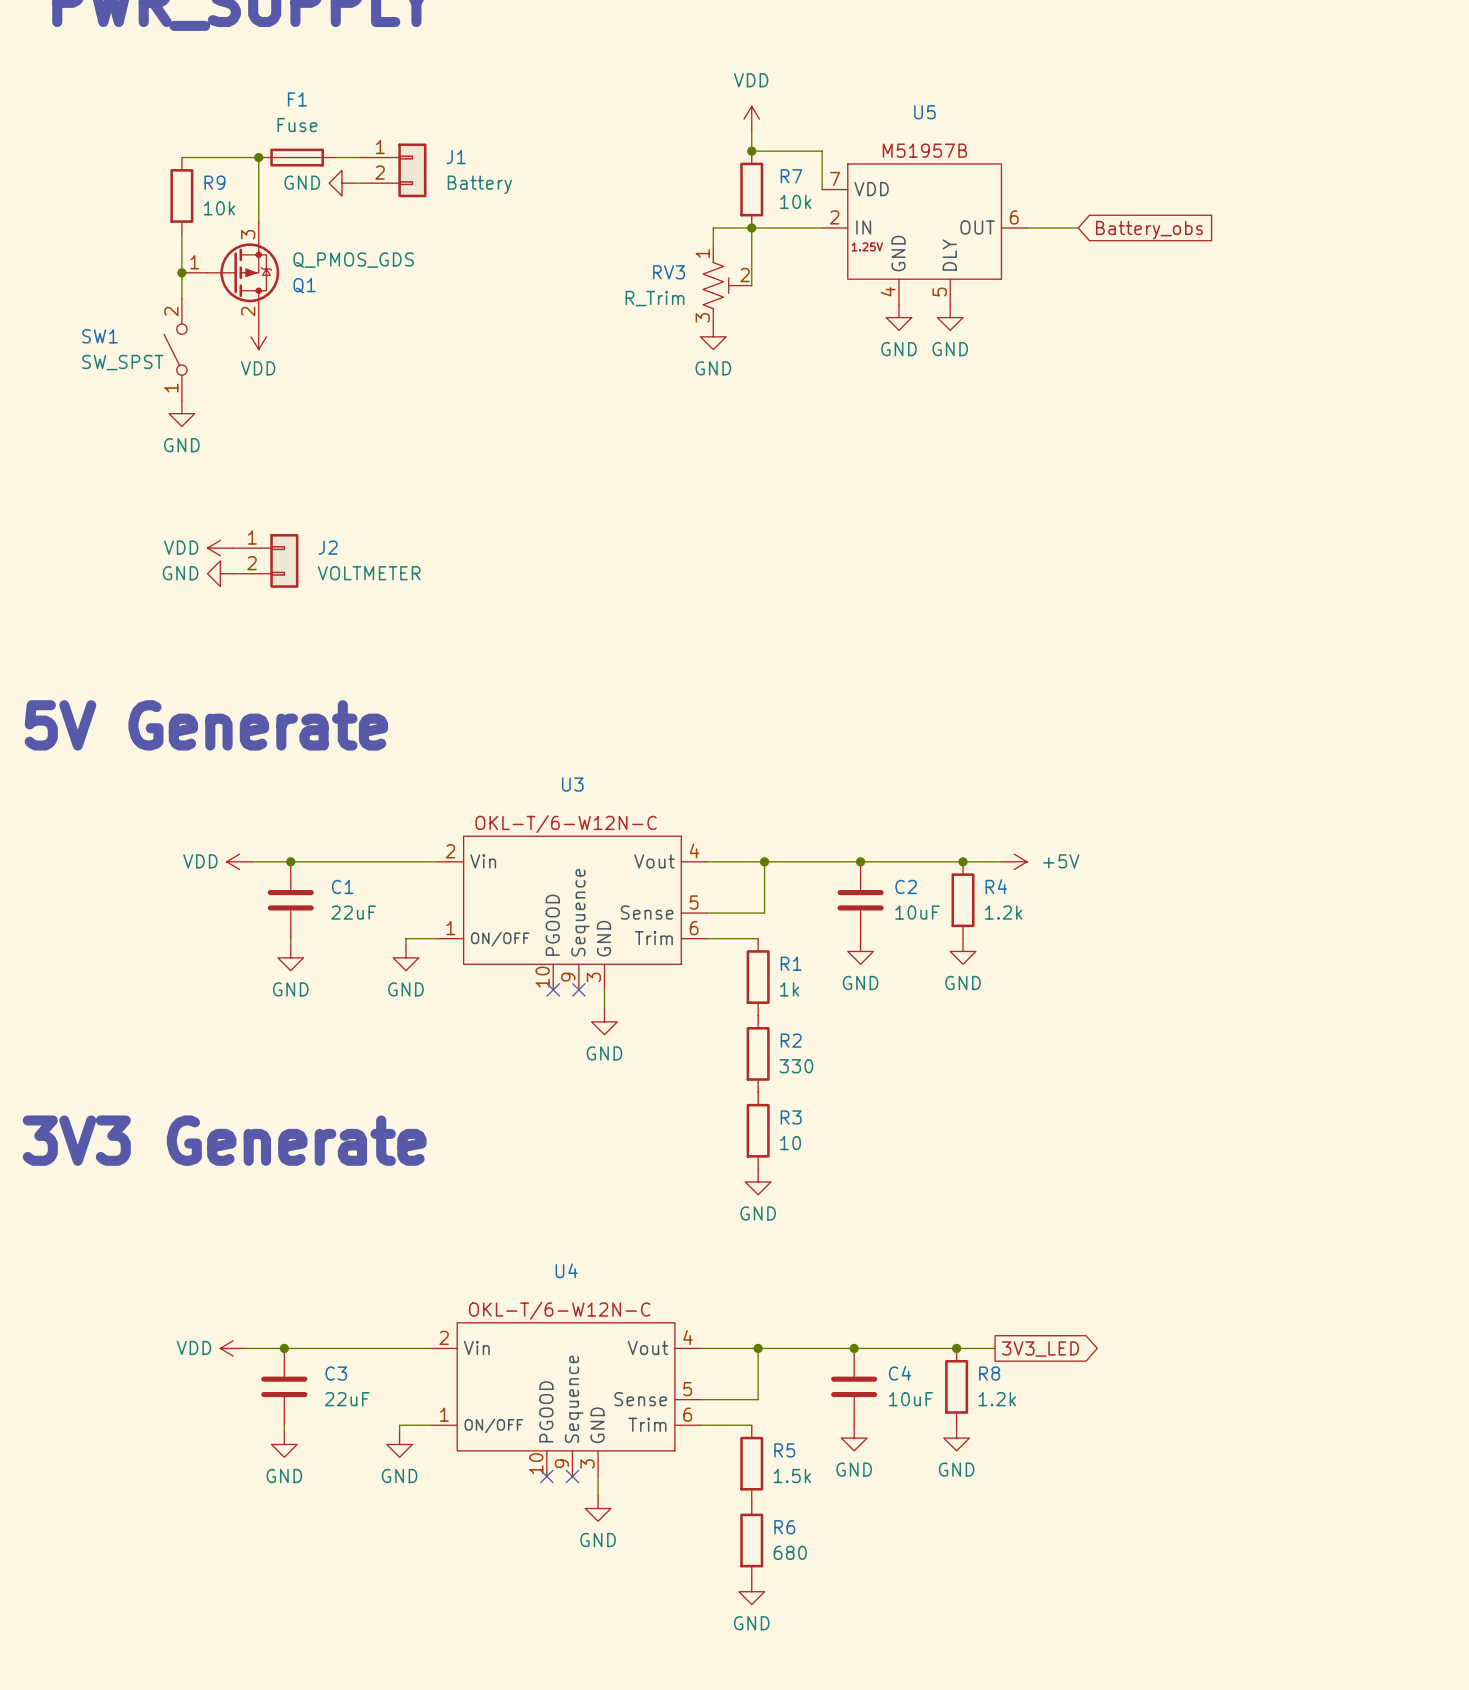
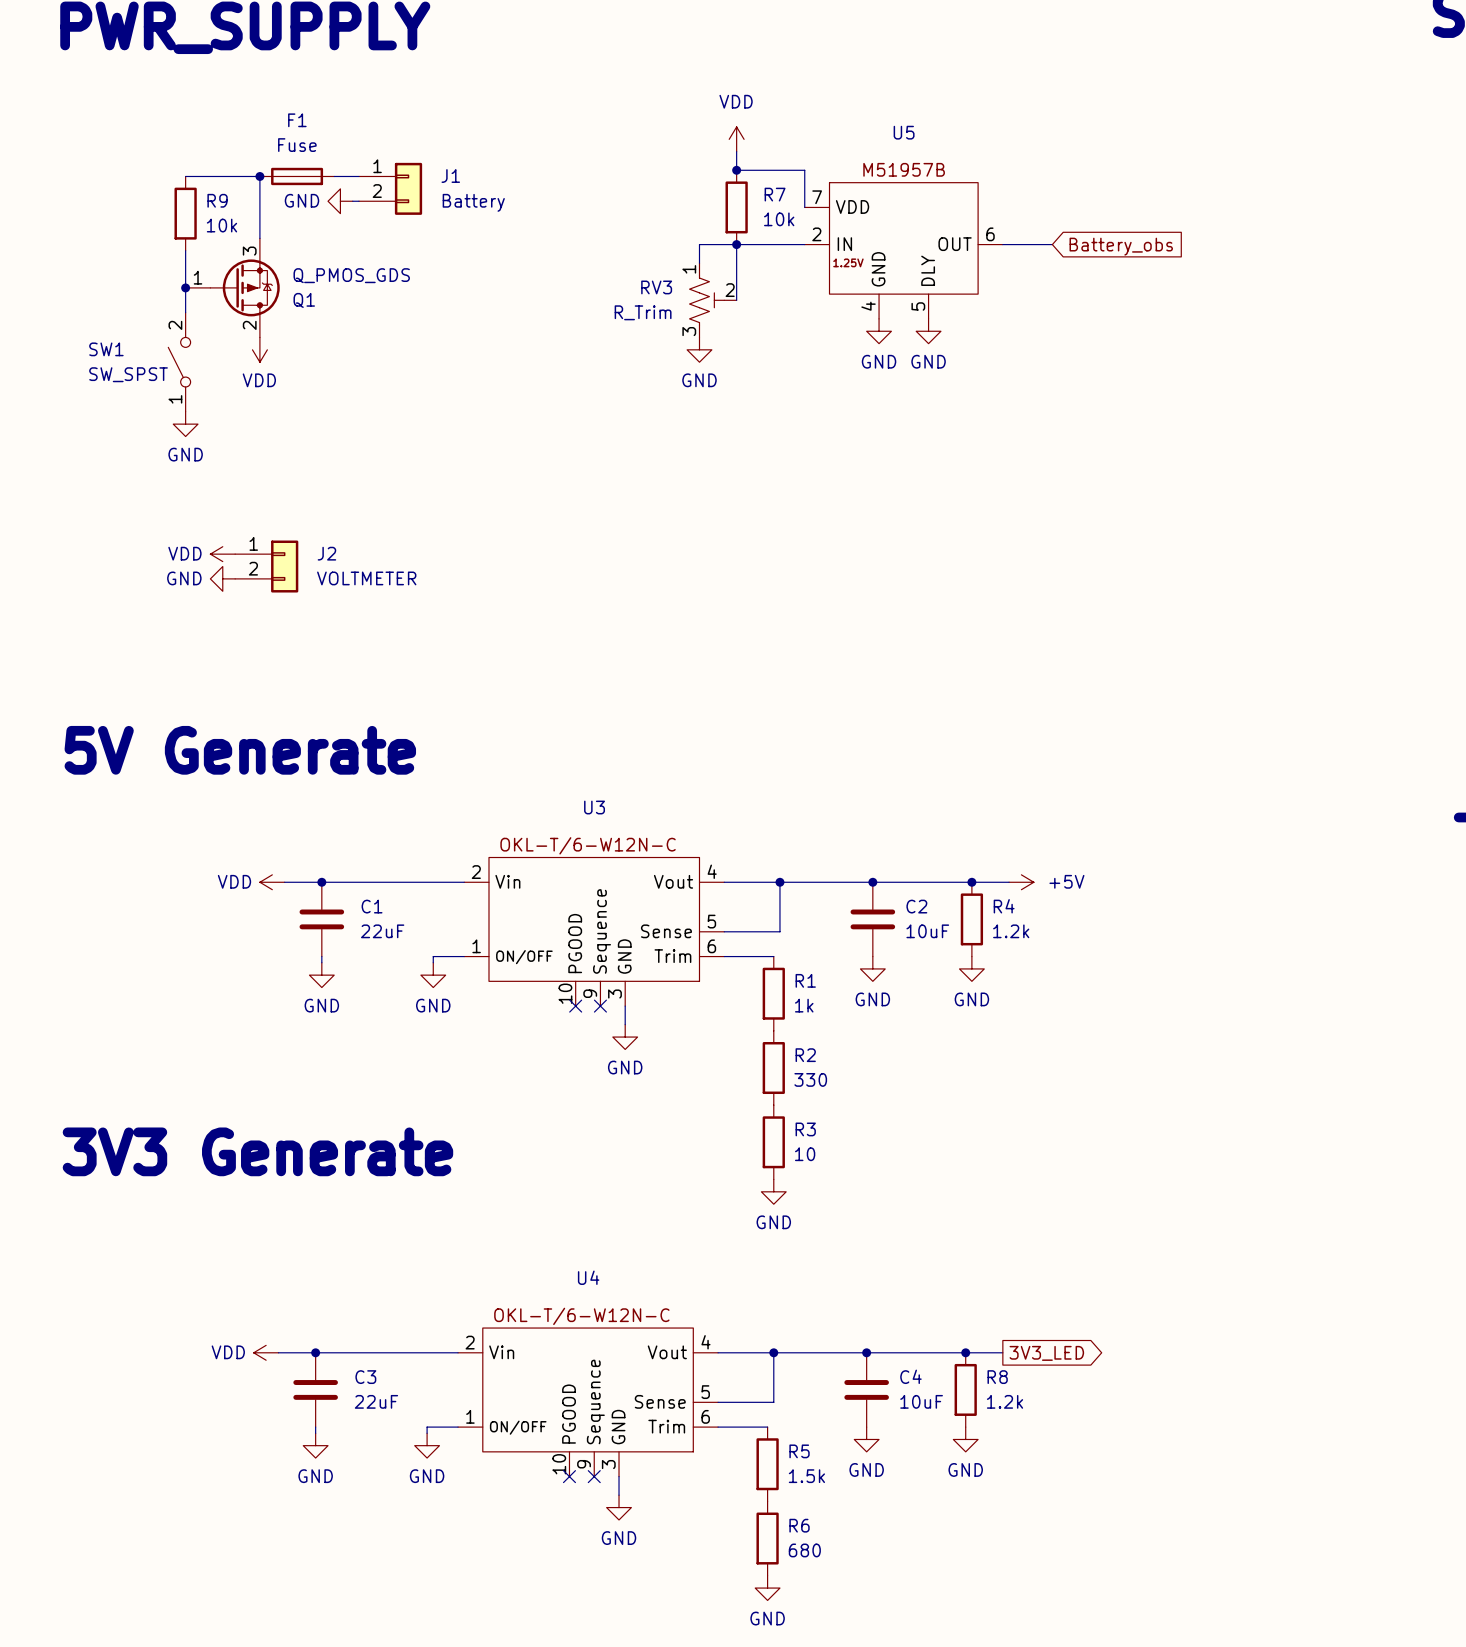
text position: 5V Generate (206, 725) -> 5V Generate (240, 750)
power symbol position: VDD (239, 861) -> VDD (272, 882)
wire: (252, 861) (438, 861) -> (284, 882) (464, 882)
junction position: (290, 861) -> (321, 882)
wire: (706, 861) (1001, 861) -> (724, 882) (1009, 882)
wire: (764, 861) (764, 913) (706, 913) -> none
junction: (764, 861) -> none
junction: (860, 861) -> none
junction: (963, 861) -> none
power symbol position: +5V (1014, 861) -> +5V (1021, 882)
wire: none -> (779, 882) (779, 931) (742, 931)
junction: none -> (779, 882)
junction: none -> (872, 882)
junction: none -> (971, 882)
C1 position: (290, 900) -> (321, 919)
C2 position: (860, 900) -> (872, 919)
R4 position: (963, 900) -> (971, 919)
U3 position: (572, 913) -> (594, 931)
wire: (290, 938) (290, 945) -> (321, 956) (321, 962)
wire: (438, 938) (406, 938) (406, 945) -> (464, 956) (433, 956) (433, 962)
power symbol: GND (860, 951) -> none
power symbol: GND (963, 951) -> none
power symbol position: GND (290, 957) -> GND (321, 975)
power symbol position: GND (406, 957) -> GND (433, 975)
wire: none -> (724, 956) (773, 956)
R1 position: (758, 977) -> (773, 993)
power symbol: none -> GND (872, 968)
power symbol: none -> GND (971, 968)
no-connect mark: (553, 989) -> none
no-connect mark: (578, 989) -> none
wire: (604, 989) (604, 1009) -> (625, 1006) (625, 1024)
no-connect mark: none -> (575, 1006)
no-connect mark: none -> (600, 1006)
power symbol position: GND (604, 1021) -> GND (625, 1037)
R2 position: (758, 1053) -> (773, 1068)
R3 position: (758, 1130) -> (773, 1142)
text position: 3V3 Generate (224, 1140) -> 3V3 Generate (257, 1151)
power symbol position: GND (758, 1181) -> GND (773, 1191)
power symbol position: VDD (233, 1348) -> VDD (266, 1352)
wire: (245, 1348) (431, 1348) -> (278, 1352) (458, 1352)
junction position: (284, 1348) -> (315, 1352)
wire: (700, 1348) (995, 1348) -> (718, 1352) (1002, 1352)
wire: (758, 1348) (758, 1399) (700, 1399) -> none
junction: (758, 1348) -> none
junction: (854, 1348) -> none
junction: (956, 1348) -> none
global label position: 3V3_LED (1040, 1349) -> 3V3_LED (1046, 1353)
wire: none -> (773, 1352) (773, 1402) (736, 1402)
junction: none -> (773, 1352)
junction: none -> (866, 1352)
junction: none -> (965, 1352)
C3 position: (284, 1386) -> (315, 1389)
C4 position: (854, 1386) -> (866, 1389)
R8 position: (956, 1386) -> (965, 1389)
U4 position: (566, 1399) -> (588, 1402)
wire: (284, 1425) (284, 1431) -> (315, 1427) (315, 1433)
wire: (431, 1425) (399, 1425) (399, 1431) -> (458, 1427) (427, 1427) (427, 1433)
power symbol: GND (854, 1438) -> none
power symbol: GND (956, 1438) -> none
power symbol position: GND (284, 1444) -> GND (315, 1445)
power symbol position: GND (399, 1444) -> GND (427, 1445)
wire: none -> (718, 1427) (767, 1427)
R5 position: (751, 1463) -> (767, 1464)
power symbol: none -> GND (866, 1439)
power symbol: none -> GND (965, 1439)
no-connect mark: (546, 1476) -> none
no-connect mark: (572, 1476) -> none
wire: (598, 1476) (598, 1495) -> (619, 1476) (619, 1495)
no-connect mark: none -> (569, 1476)
no-connect mark: none -> (594, 1476)
power symbol position: GND (598, 1508) -> GND (619, 1507)
R6 position: (751, 1540) -> (767, 1538)
power symbol position: GND (751, 1591) -> GND (767, 1588)

